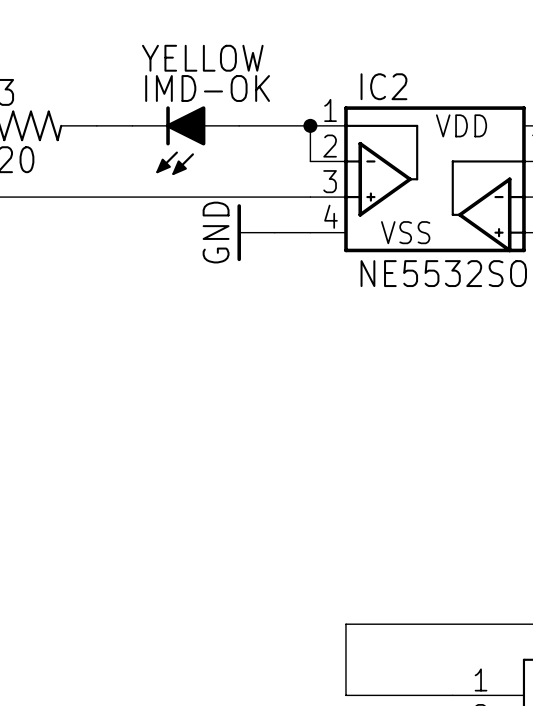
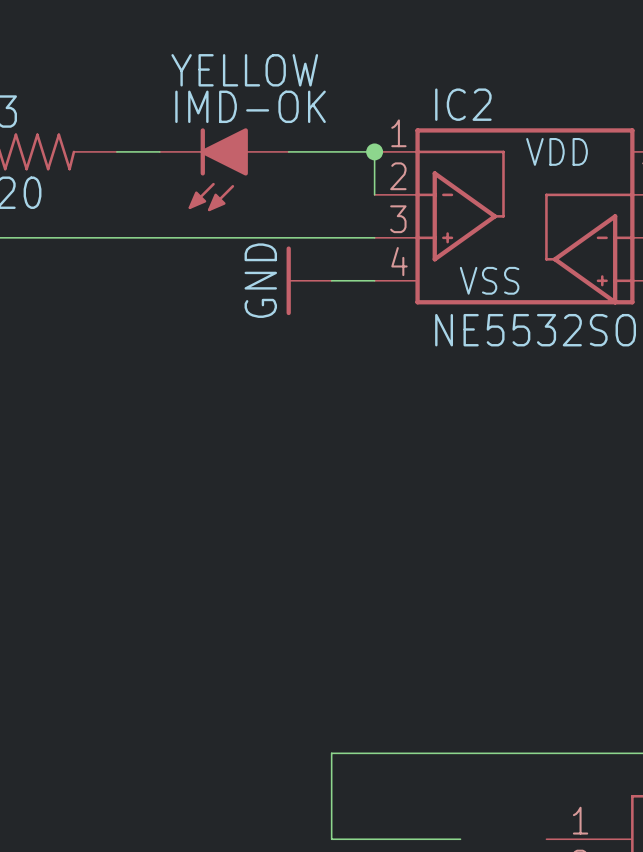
wire: (345, 624) (345, 695) -> (417, 753) (331, 753) (331, 839) (417, 839)
wire: (381, 695) (452, 695) -> none

